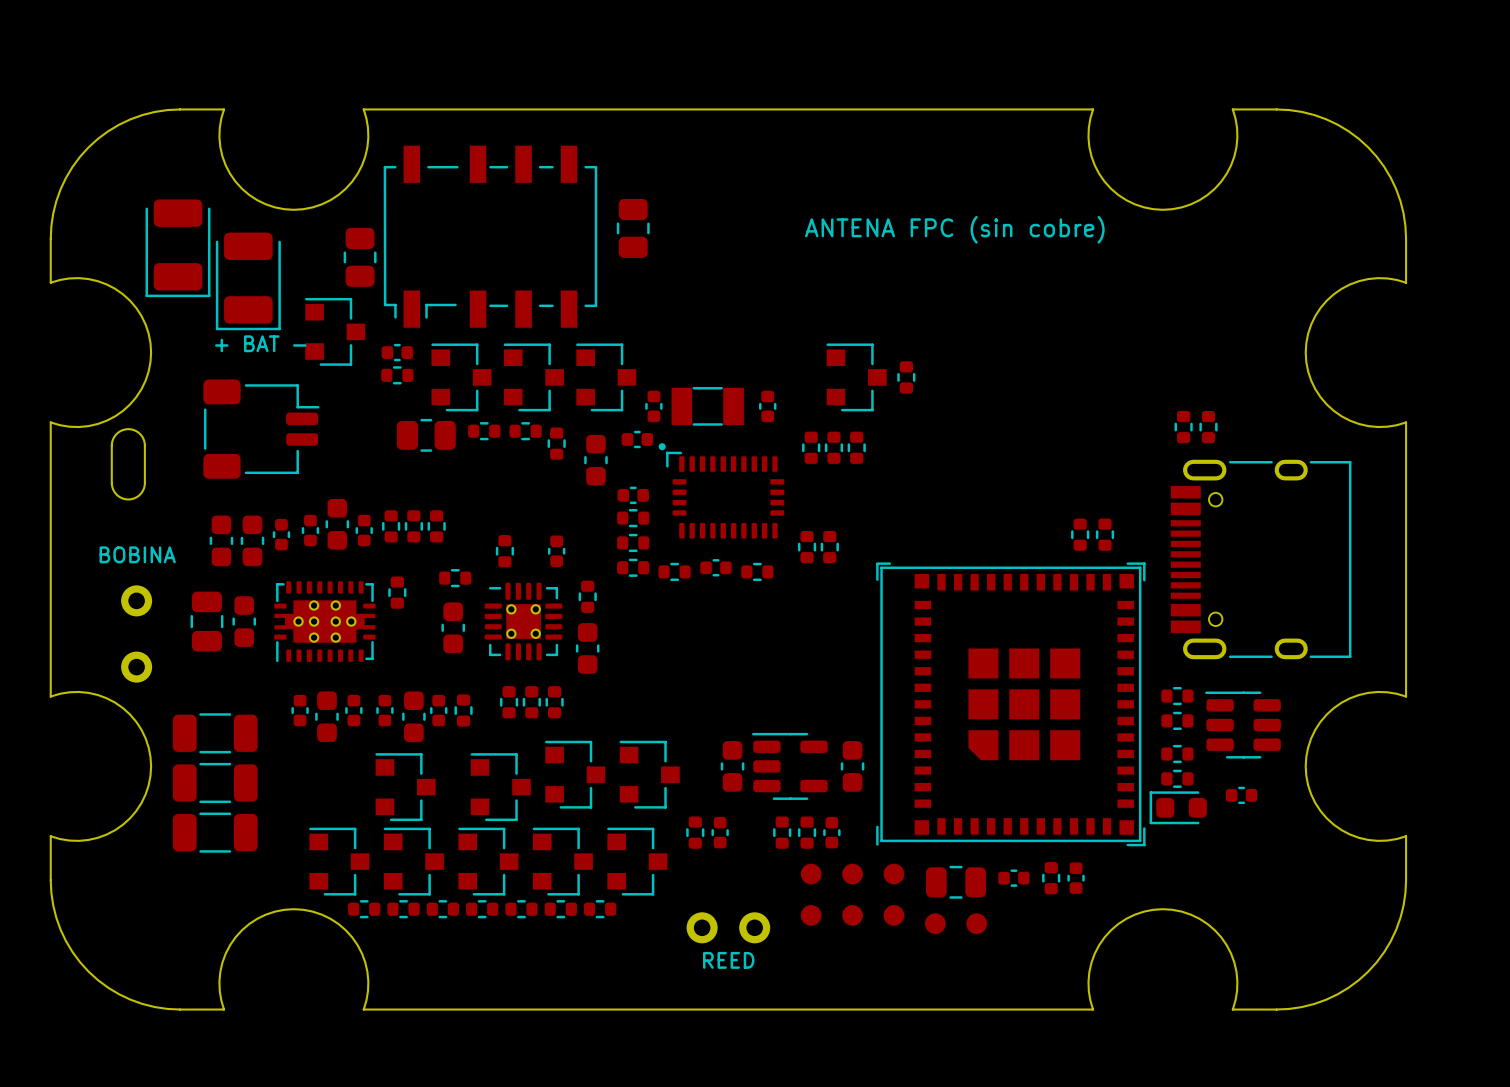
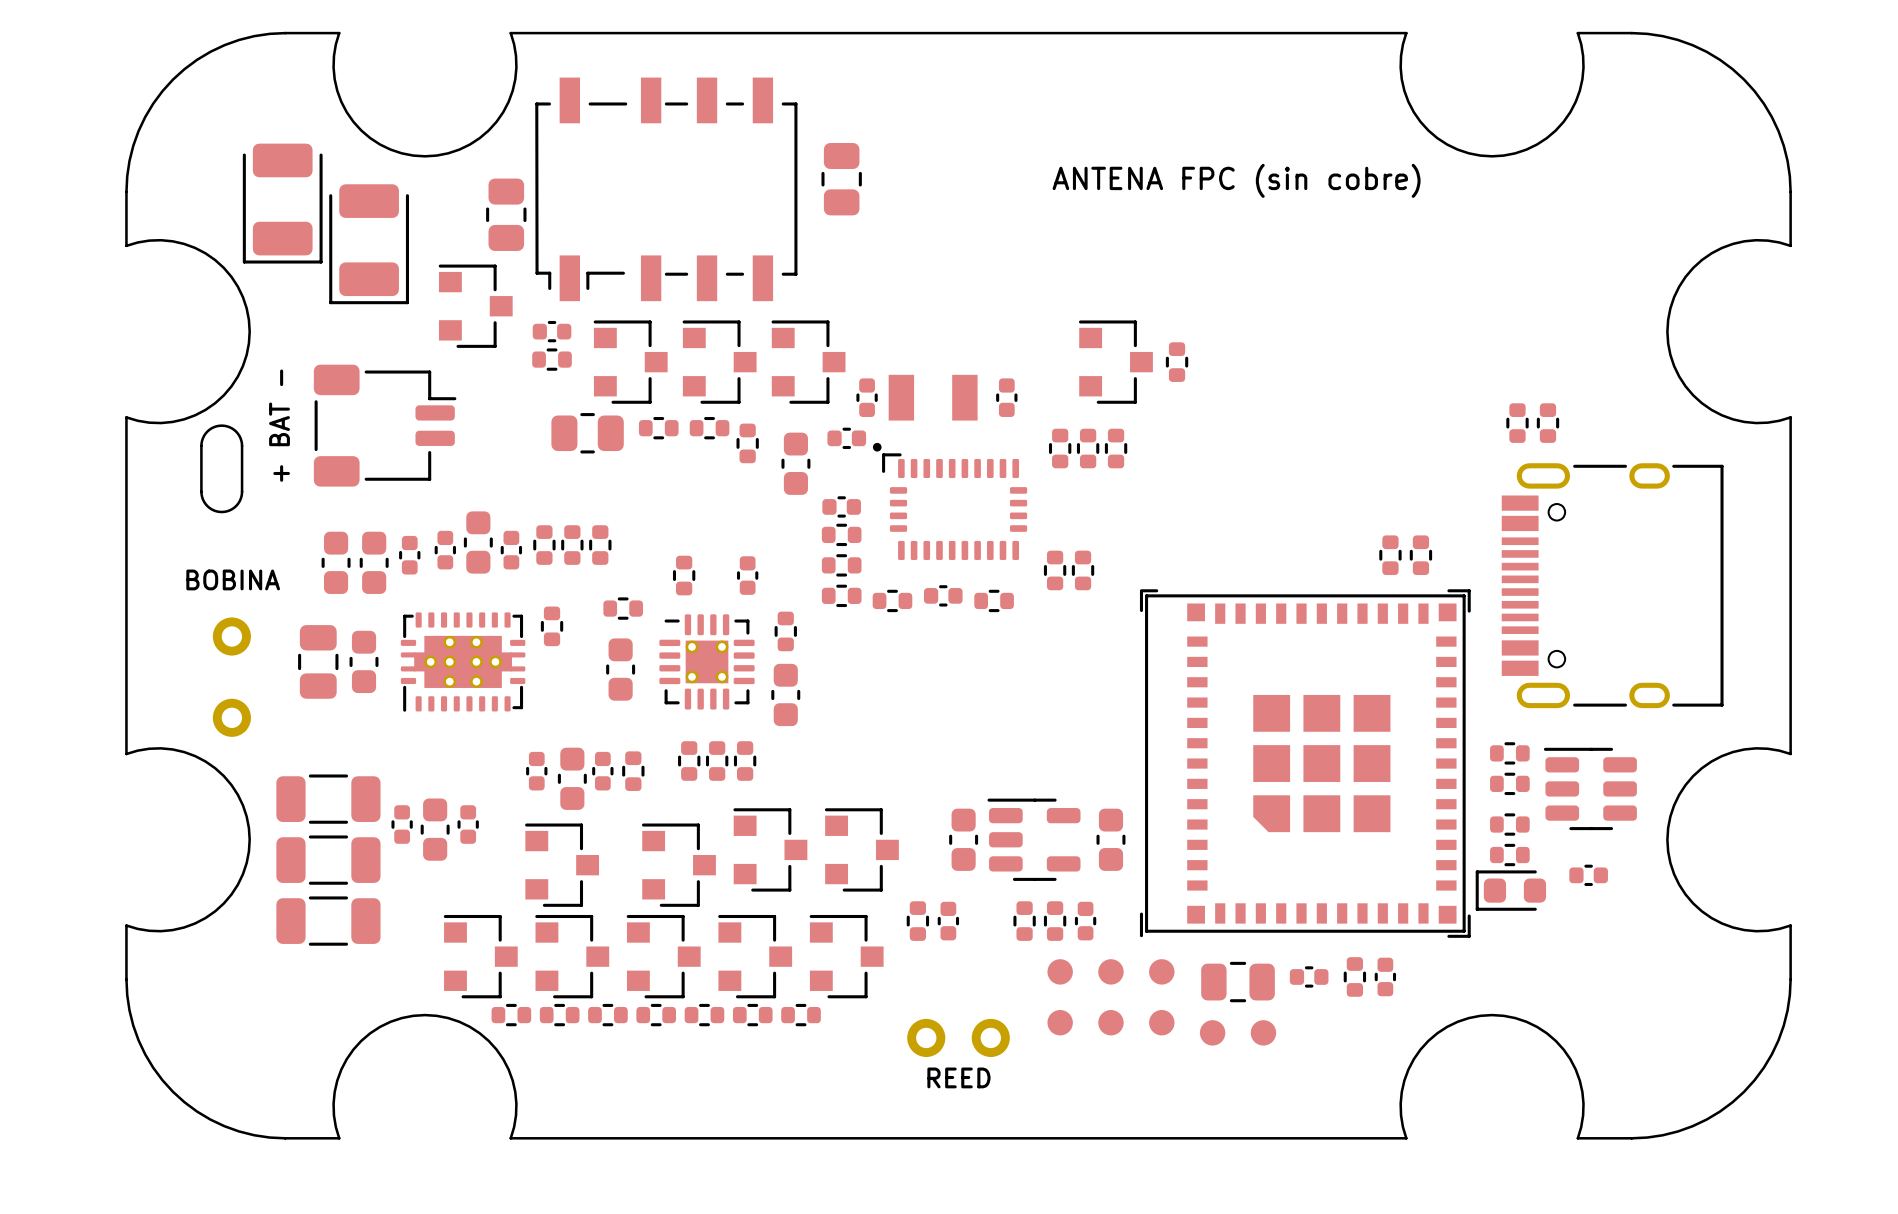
text rotation: 0° (260, 343) -> 90° counterclockwise (279, 425)
text position: + BAT − (260, 343) -> + BAT − (279, 425)
part footprint: [671, 387, 744, 426] -> [888, 374, 978, 421]
part: (300, 710) -> none
part: (353, 710) -> none
part position: (326, 716) -> (435, 829)
part: none -> (402, 824)
part: none -> (468, 824)

